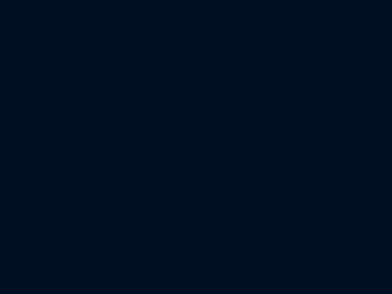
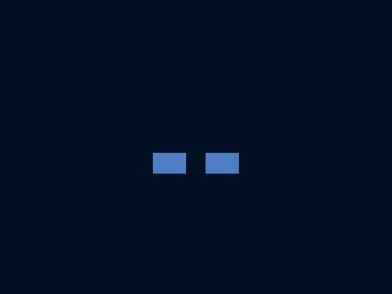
part: none -> (195, 163)

